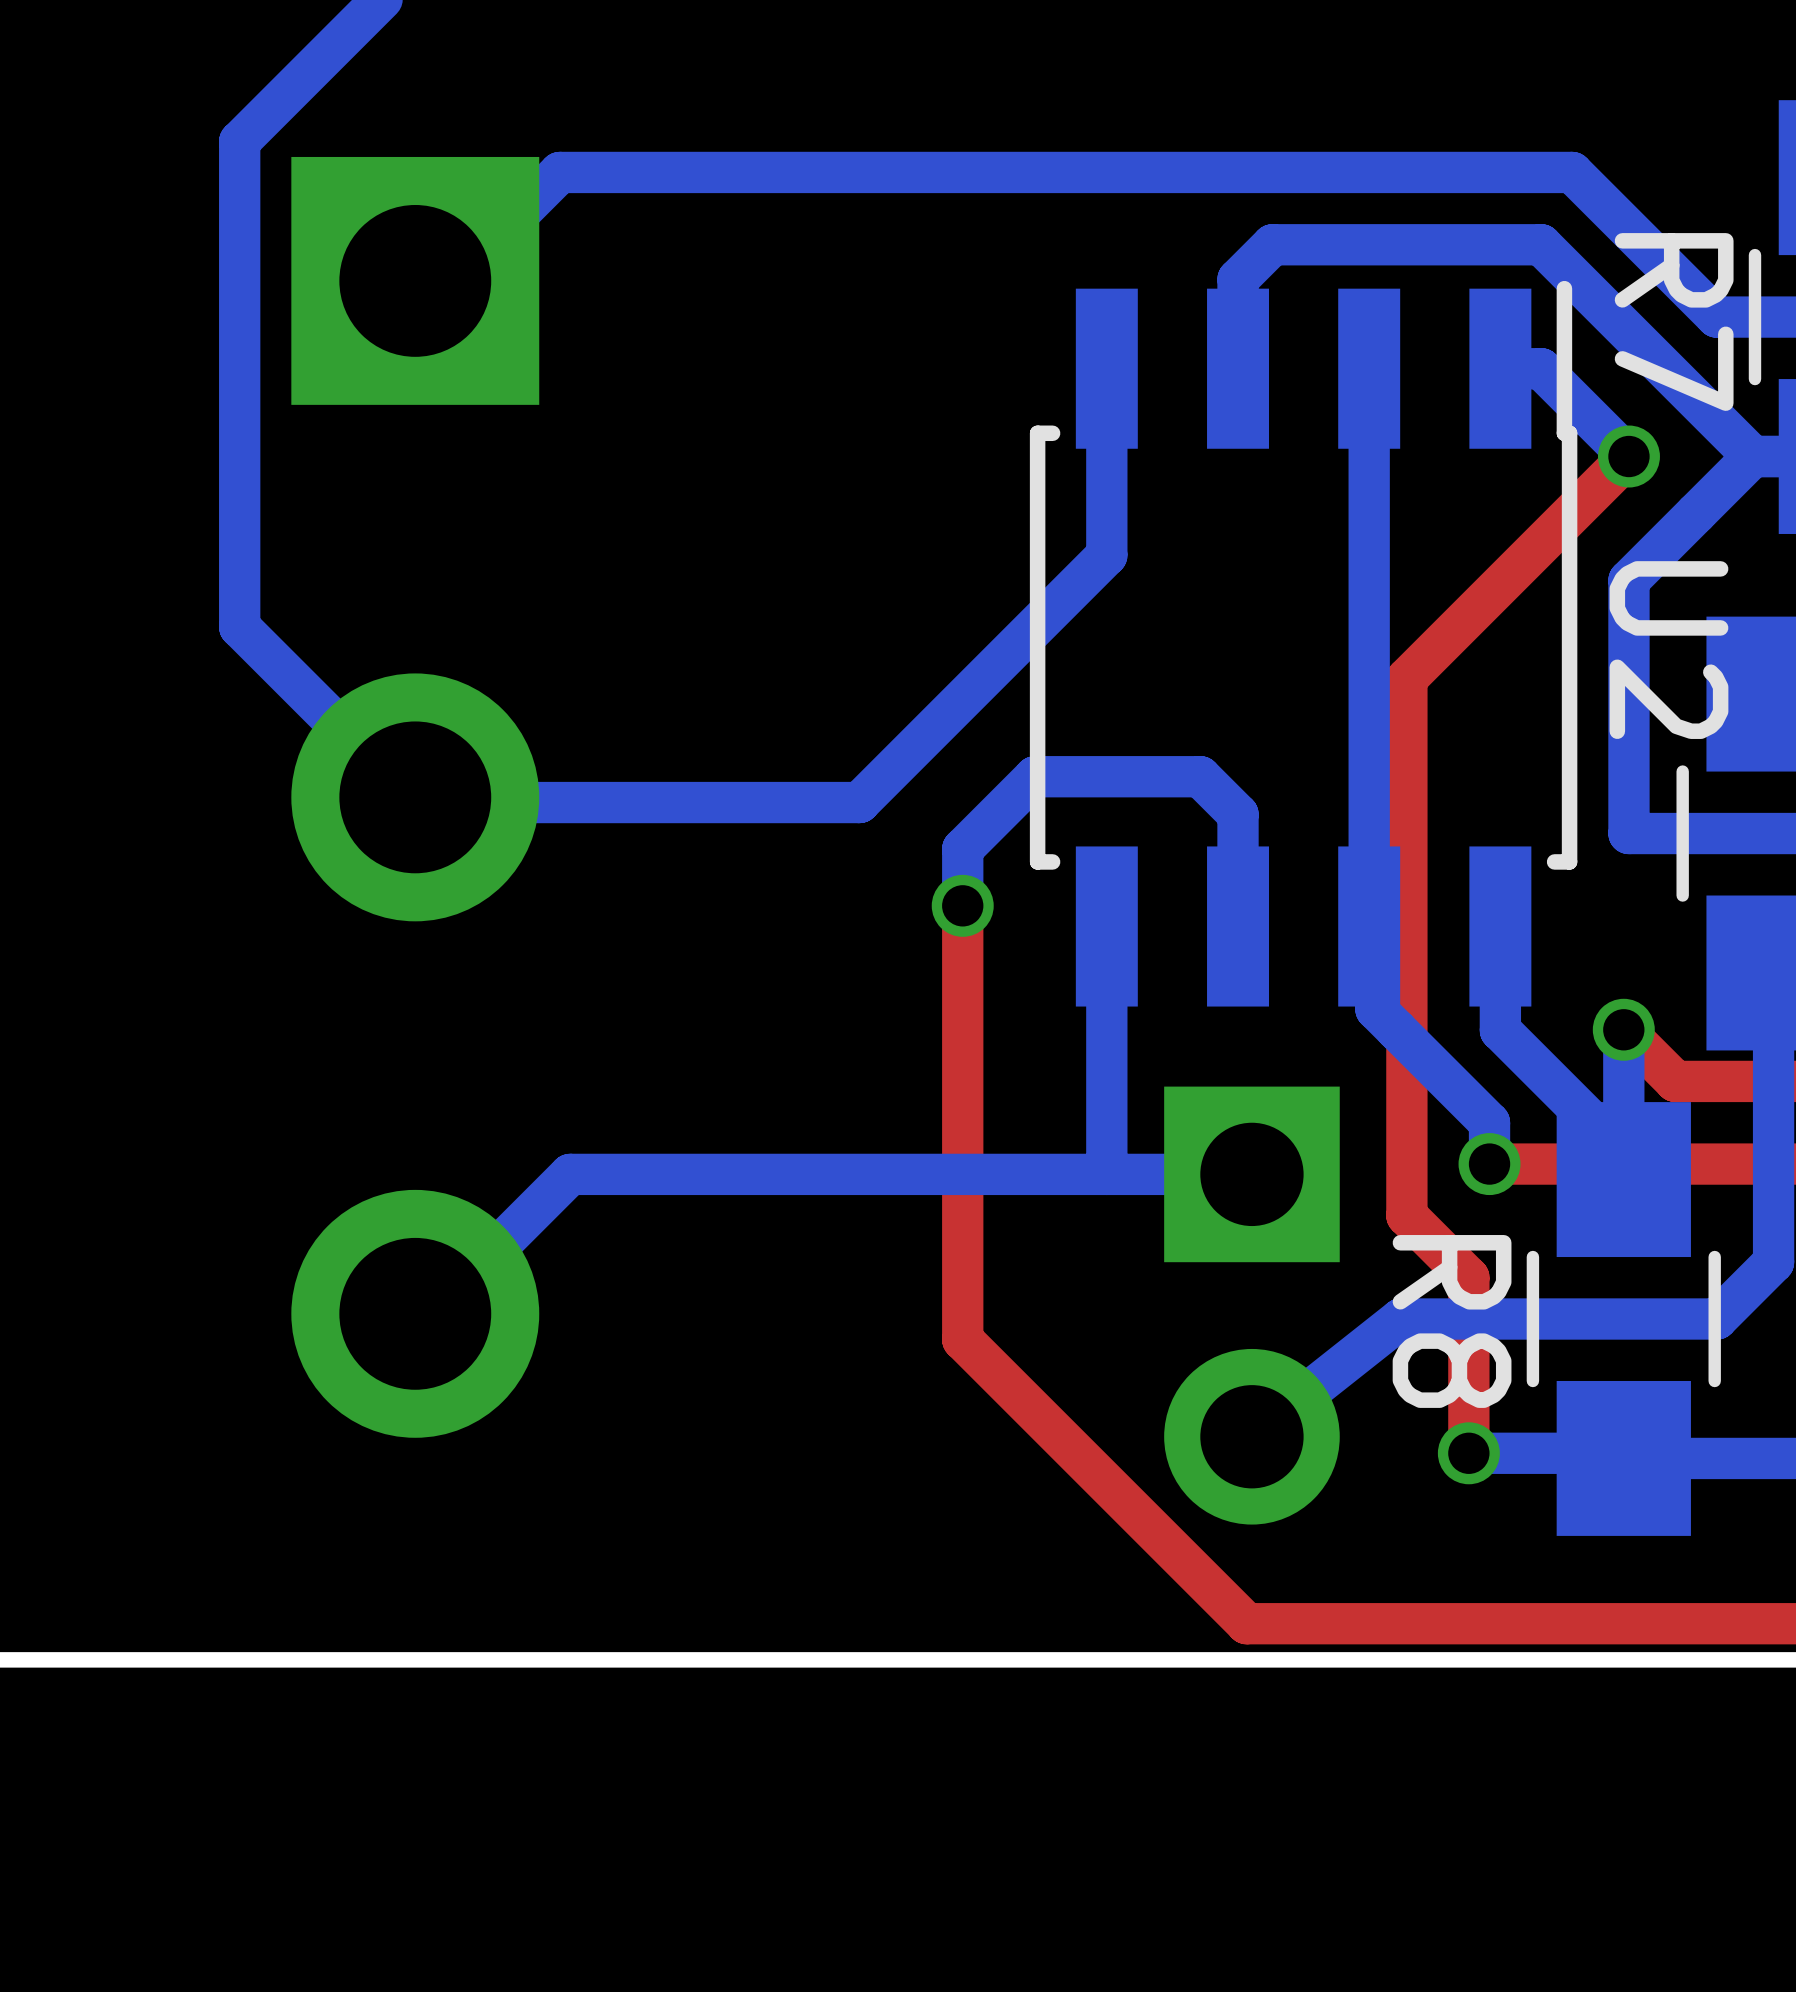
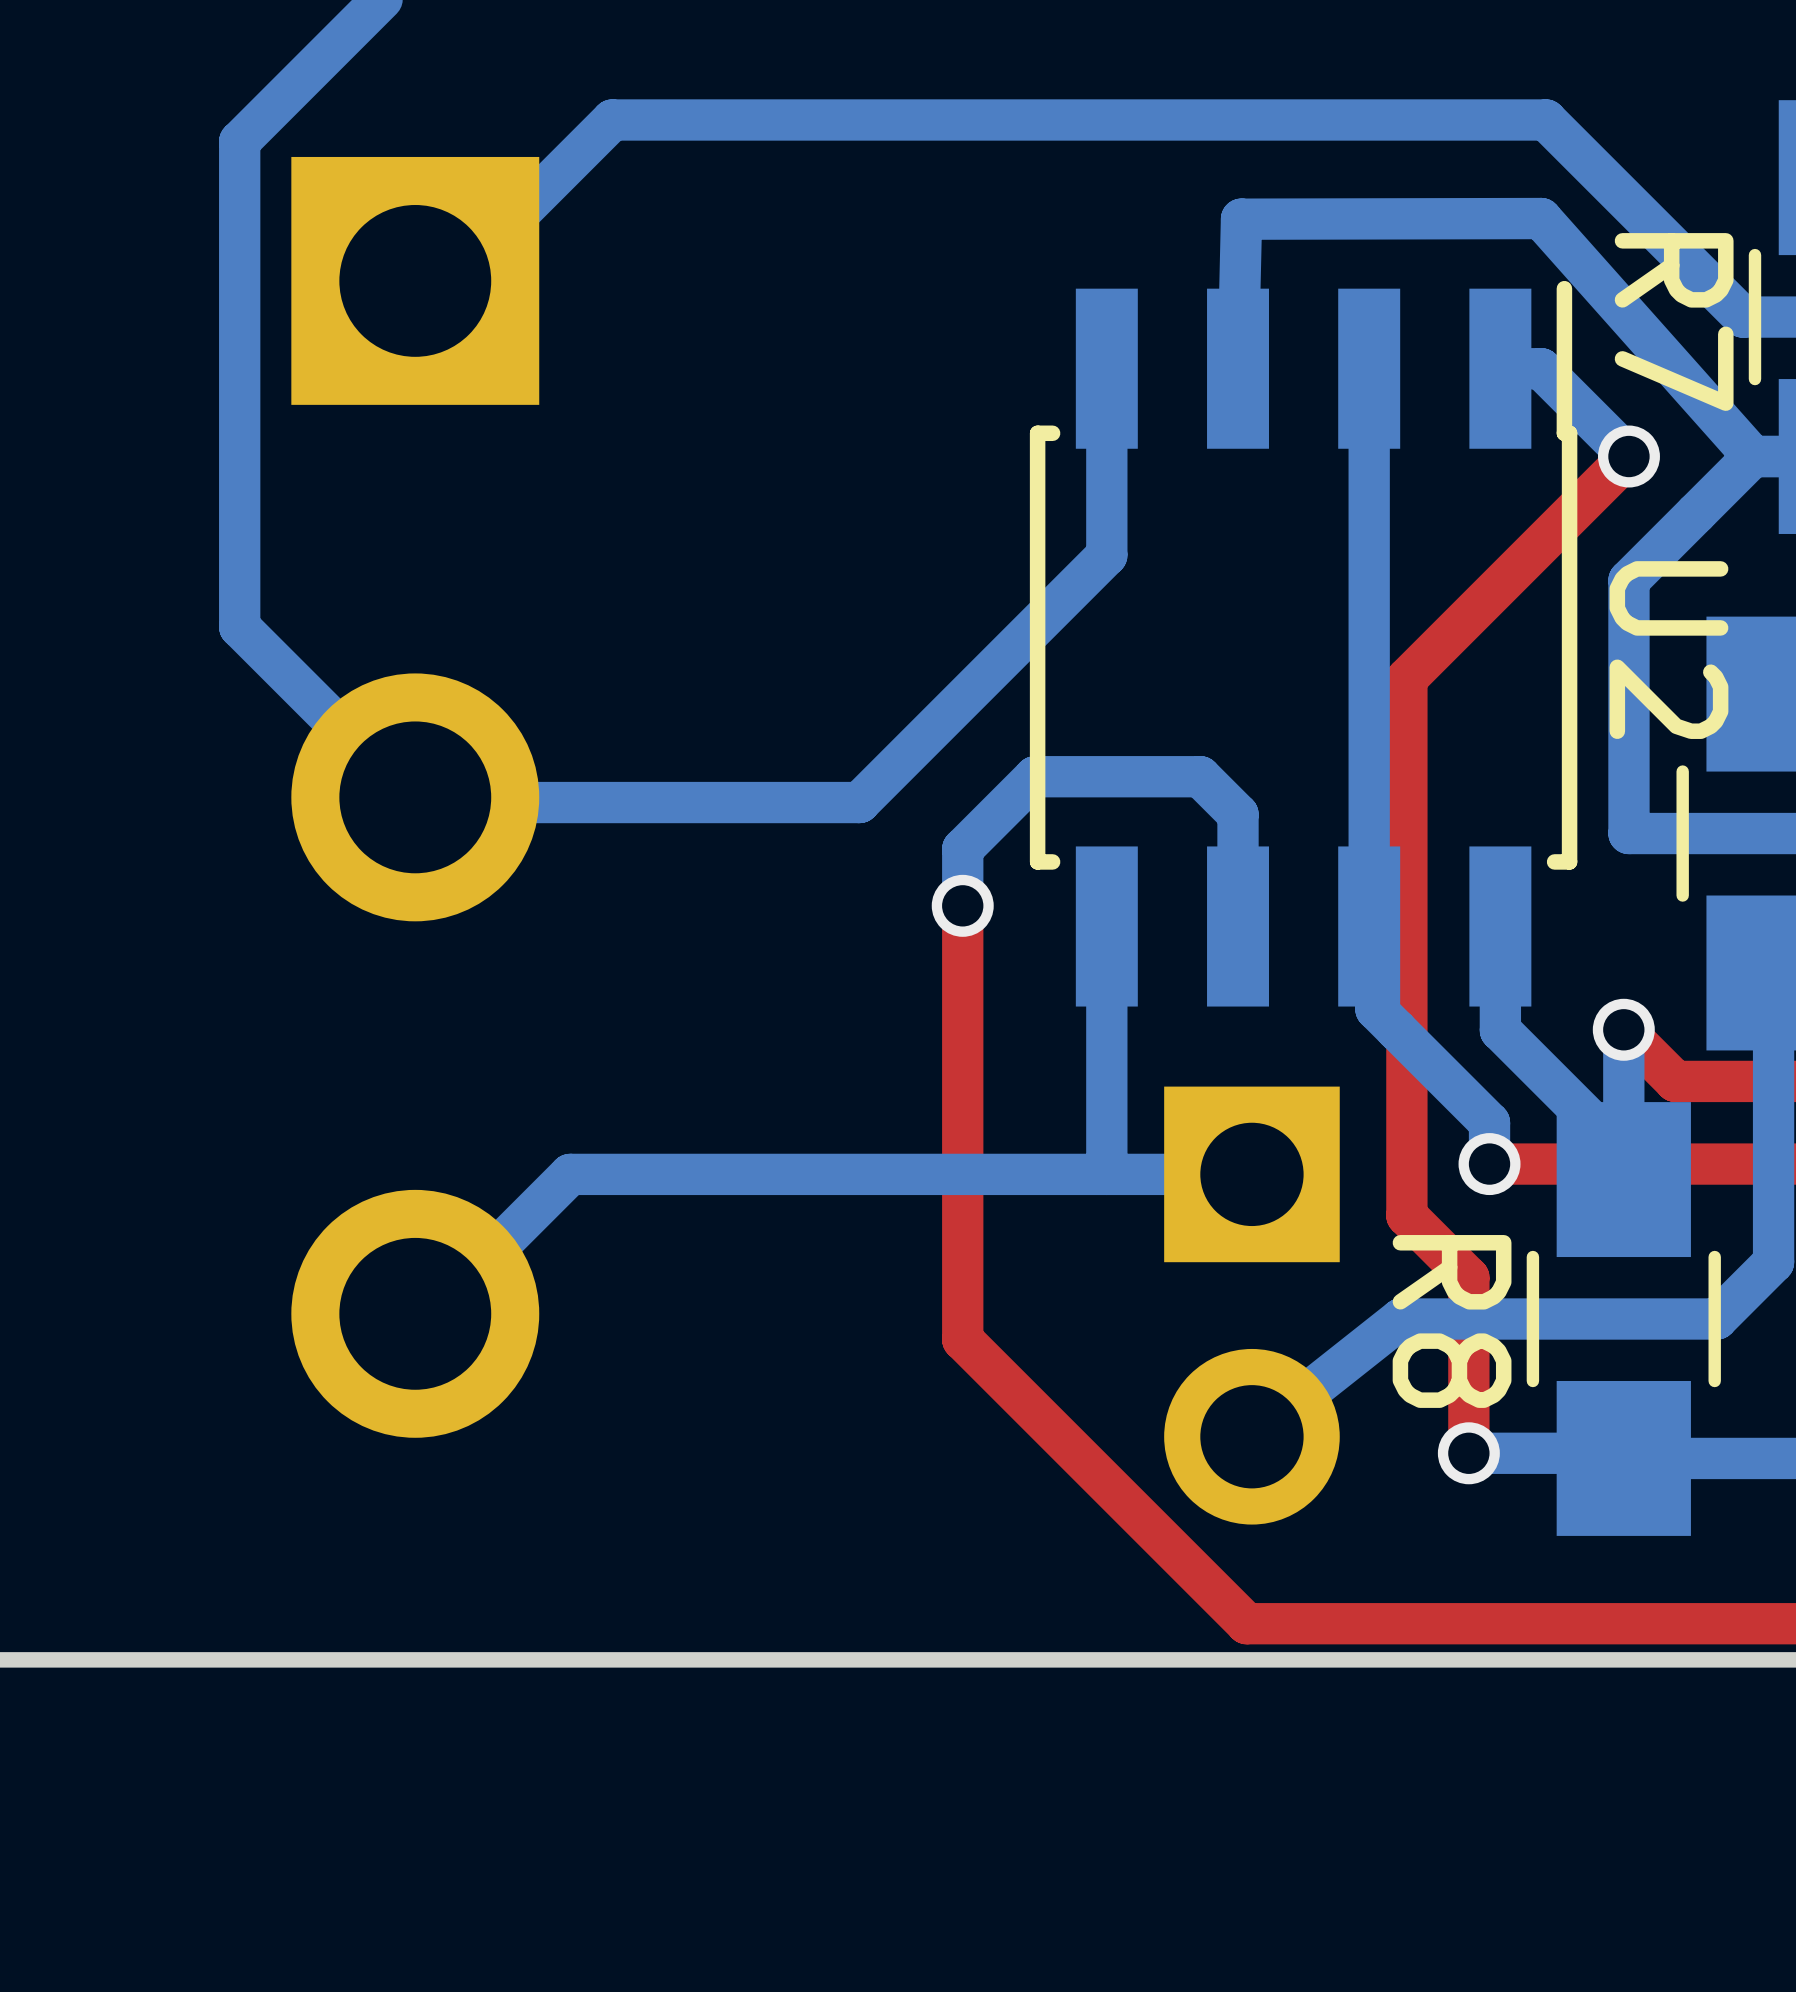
bottom track: (559, 172) (1572, 172) (1716, 317) (1743, 317) -> (559, 172) (612, 119) (1545, 119) (1743, 317)
bottom track: (1238, 368) (1238, 279) (1272, 244) (1541, 244) (1752, 456) -> (1238, 368) (1241, 219) (1541, 218) (1752, 456)

